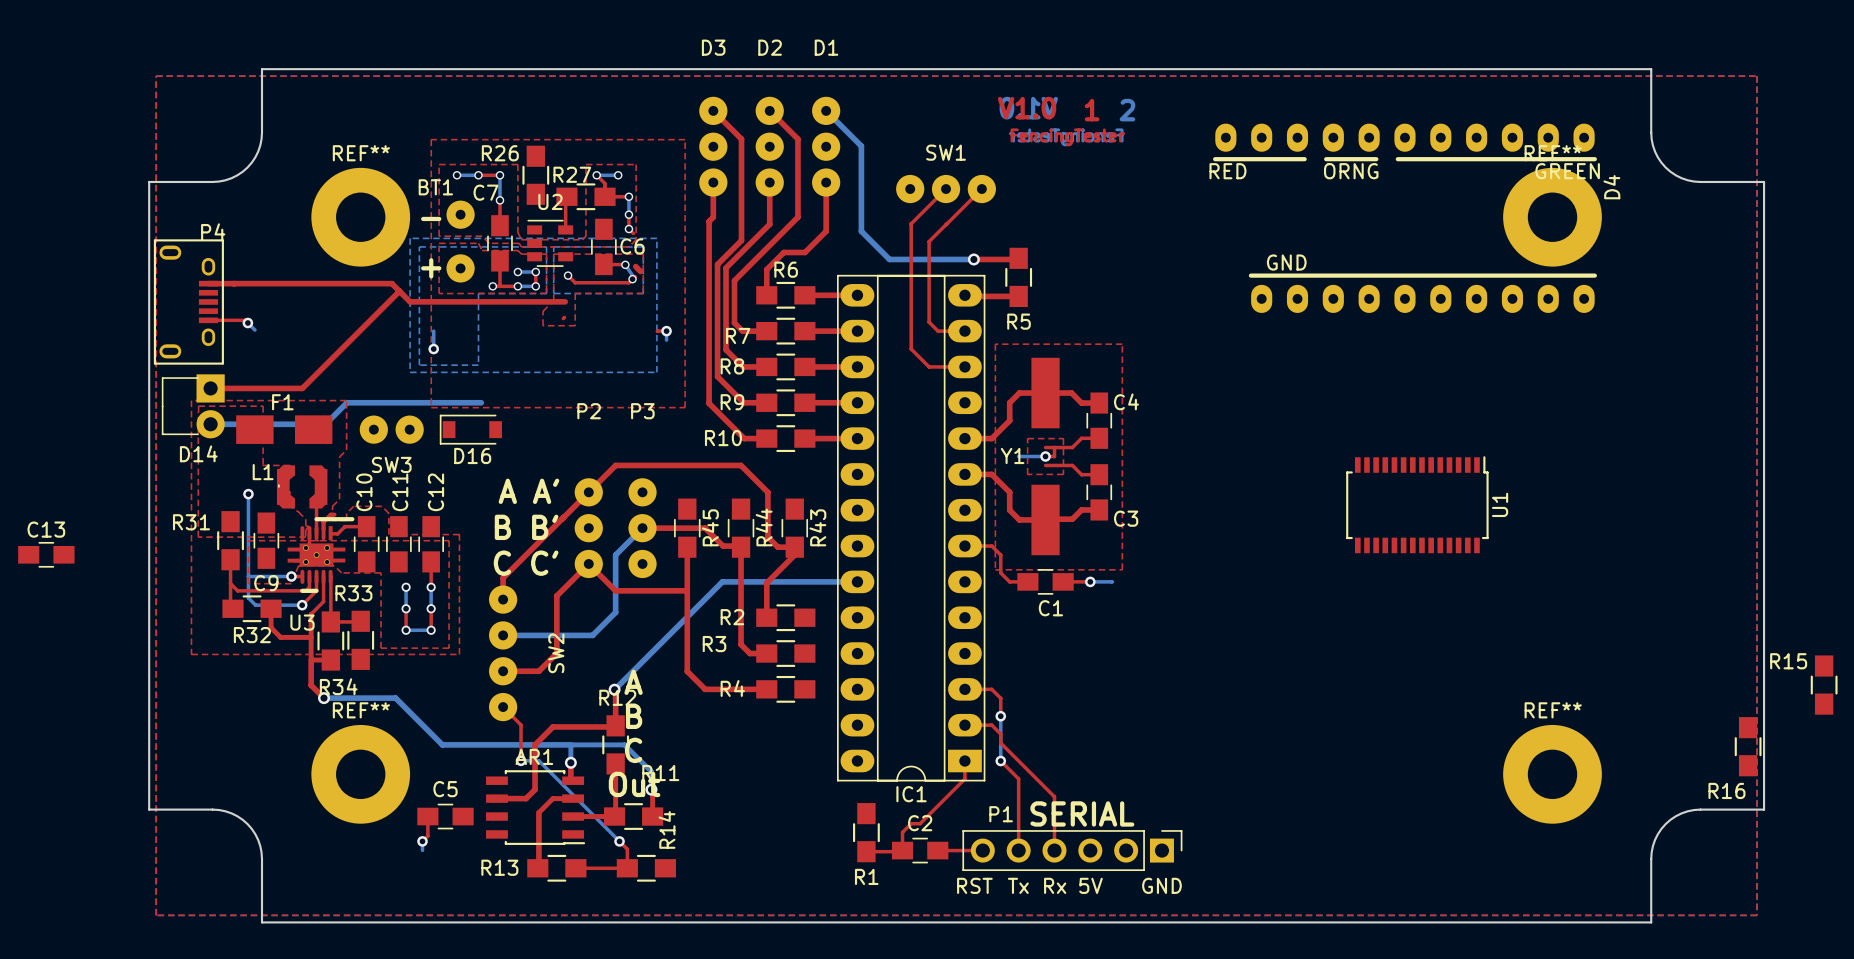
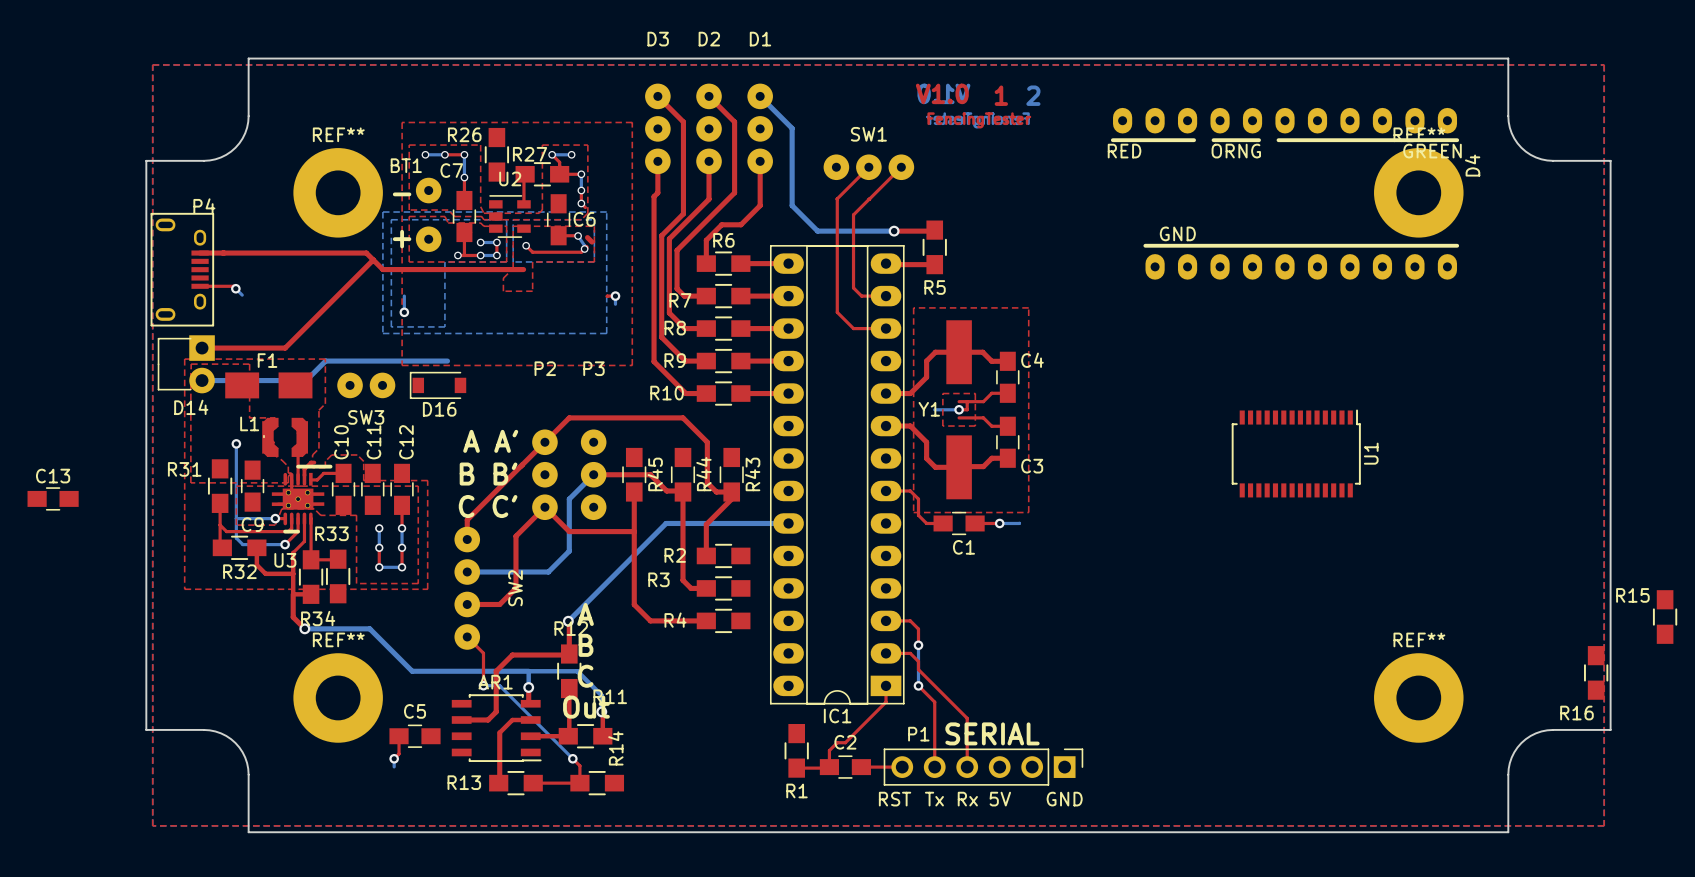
top track: (564, 317) (563, 318) -> none

